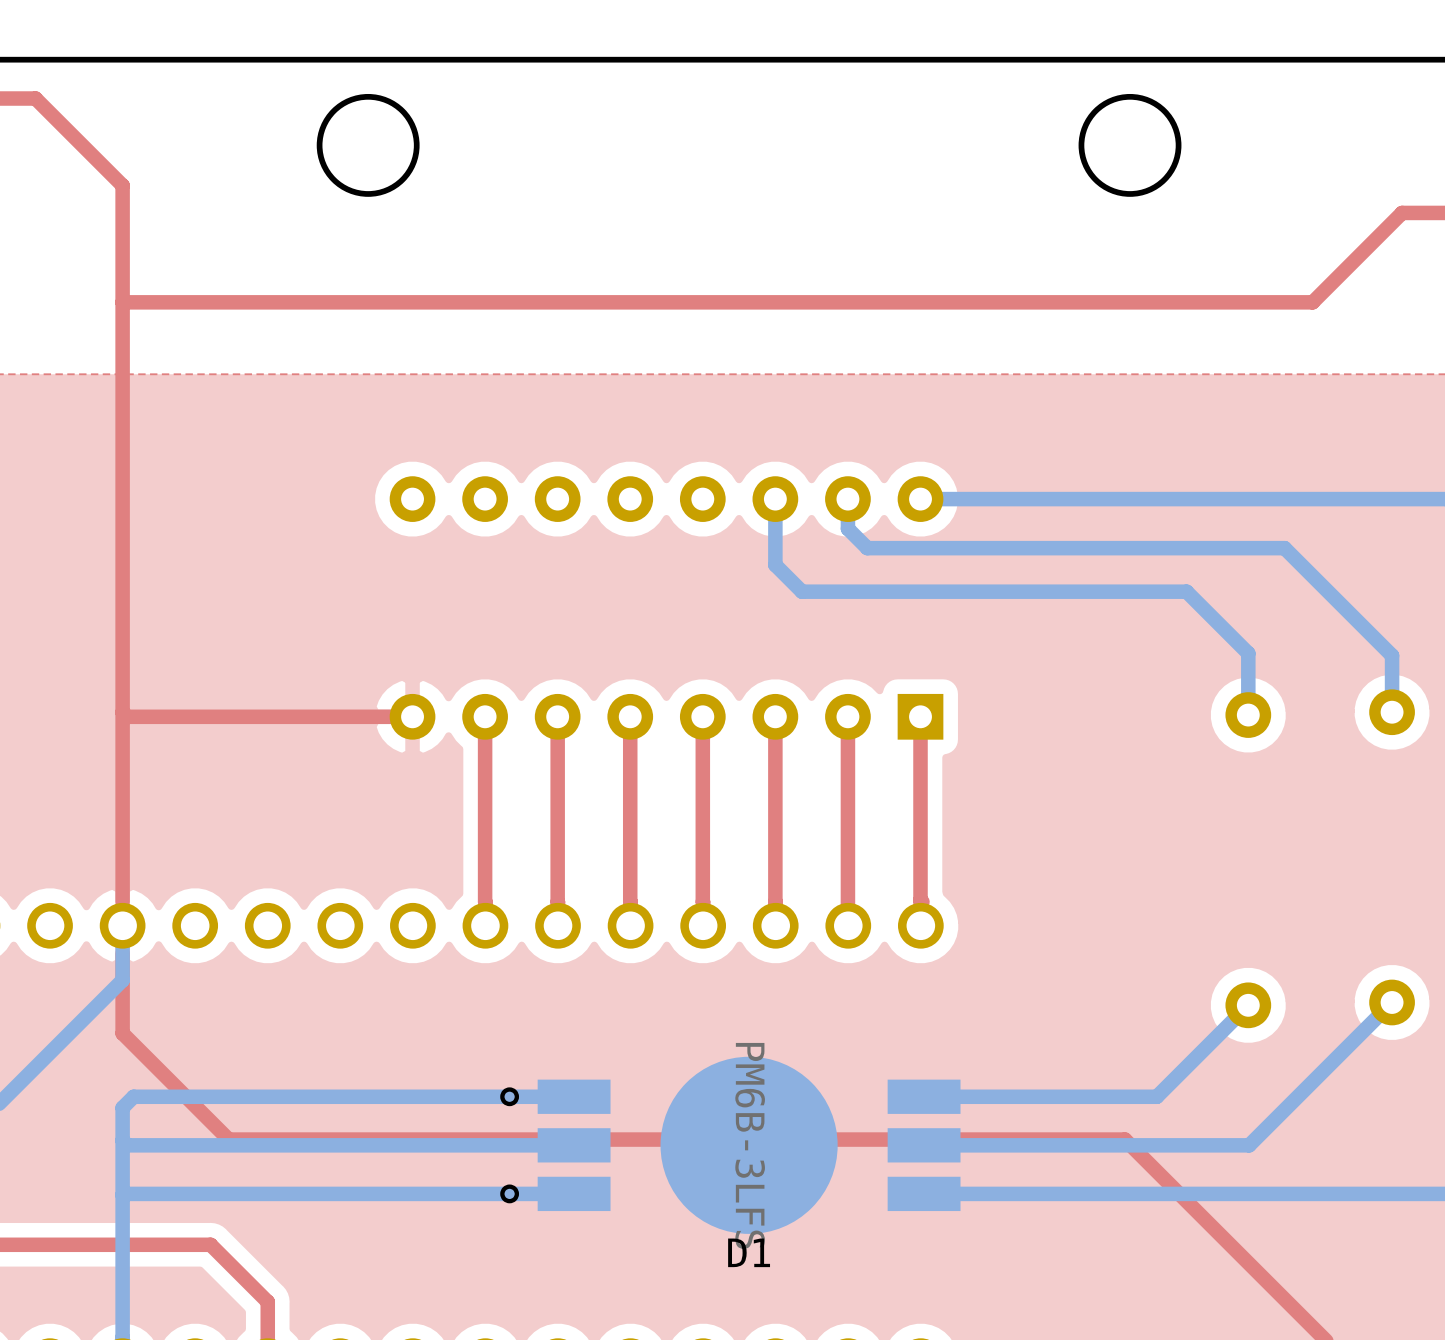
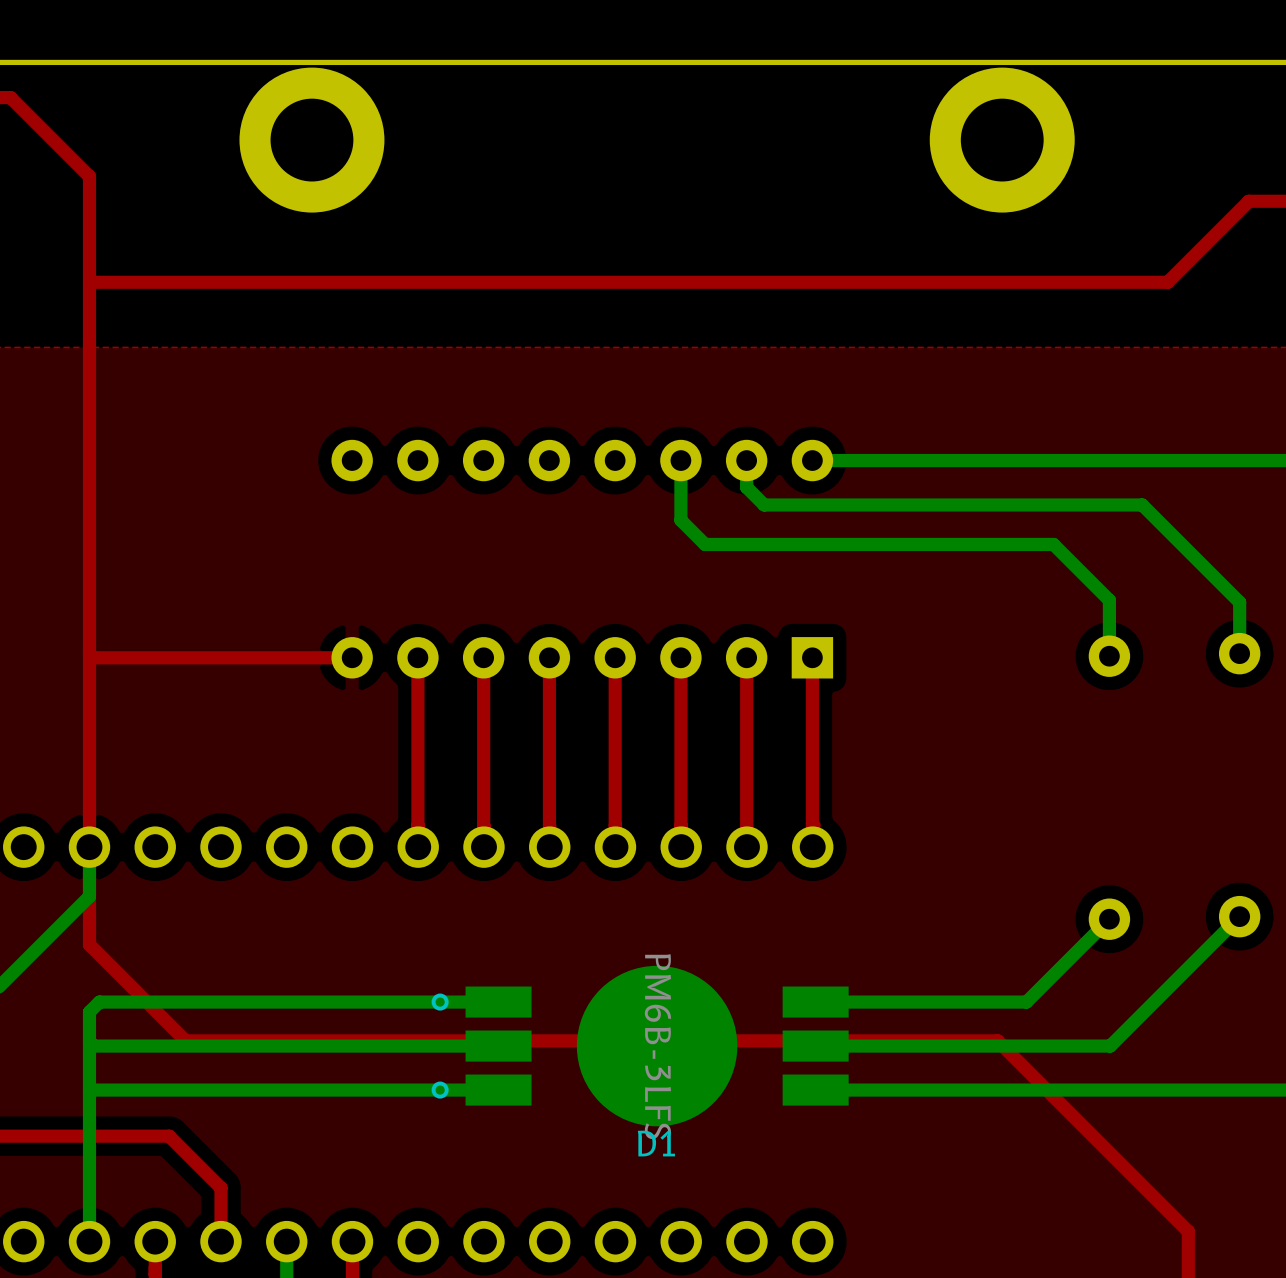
round board edge: [316, 93, 420, 197] -> none
round board edge: [1078, 93, 1182, 197] -> none
part: none -> (311, 140)
part: none -> (1002, 140)

